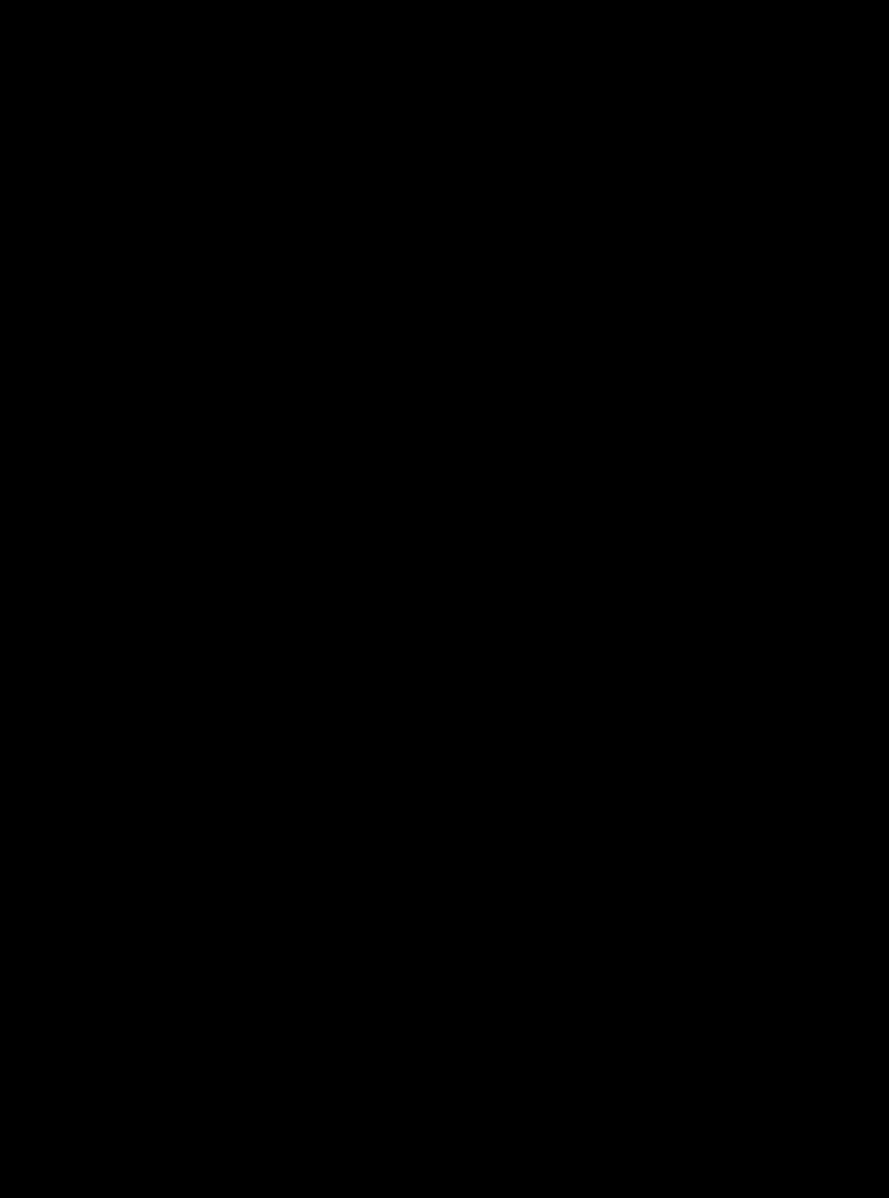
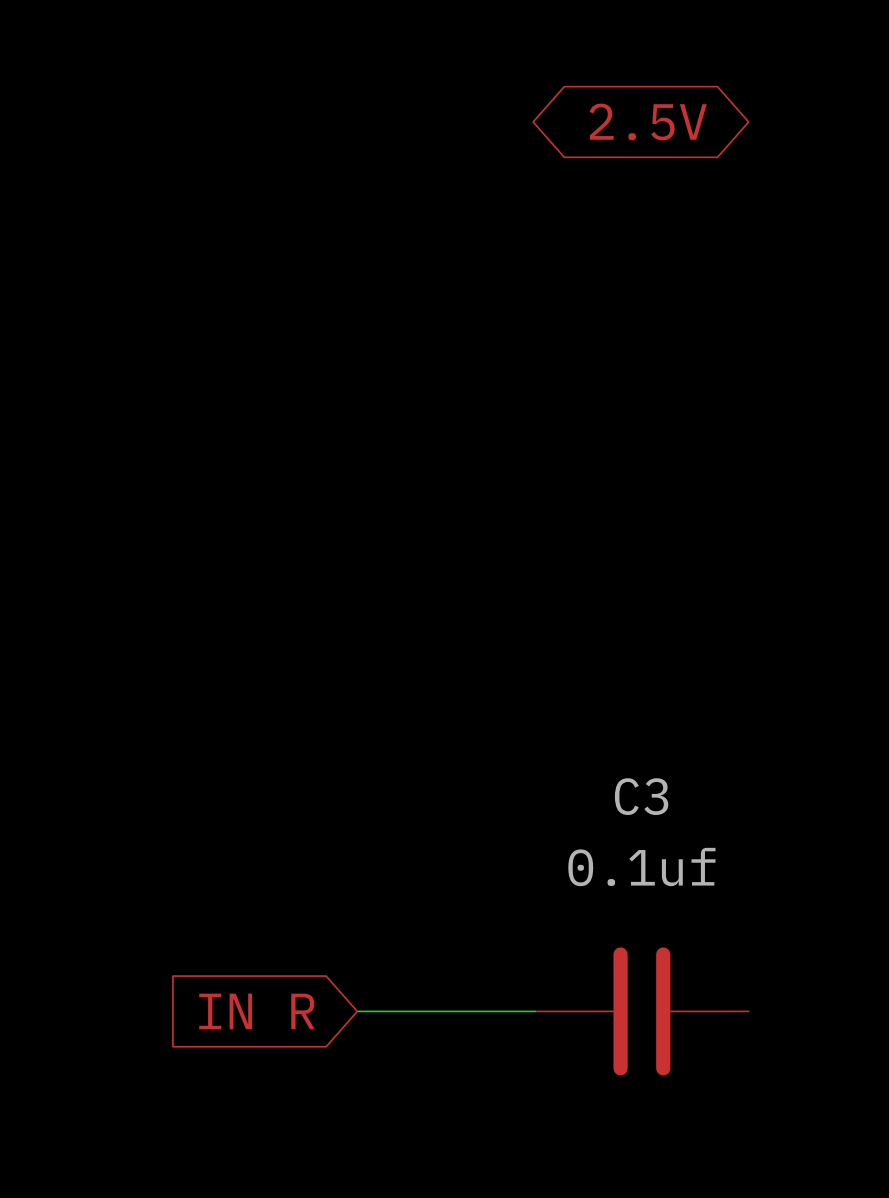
global label: none -> 2.5V (648, 121)
global label: none -> IN R (256, 1011)
wire: none -> (357, 1011) (535, 1011)
C3: none -> 0.1uf (641, 1011)

